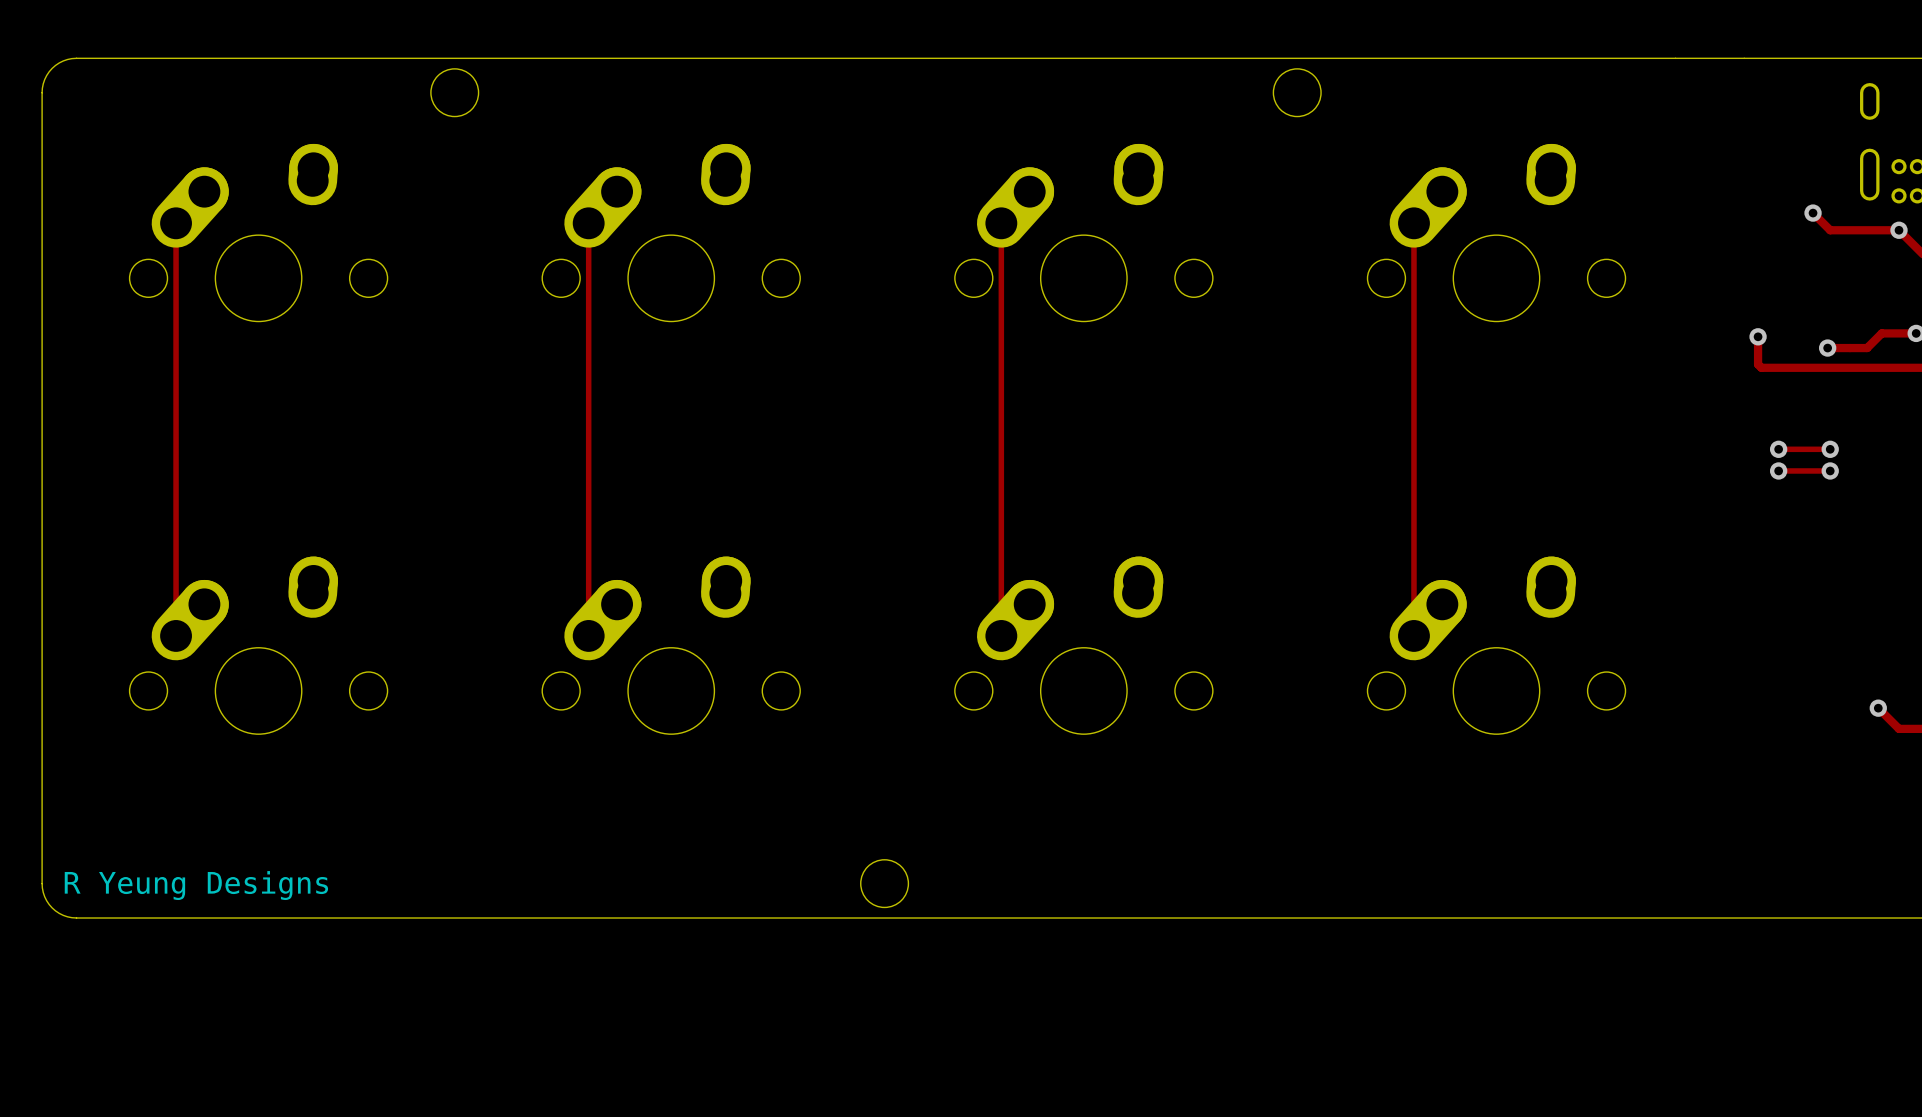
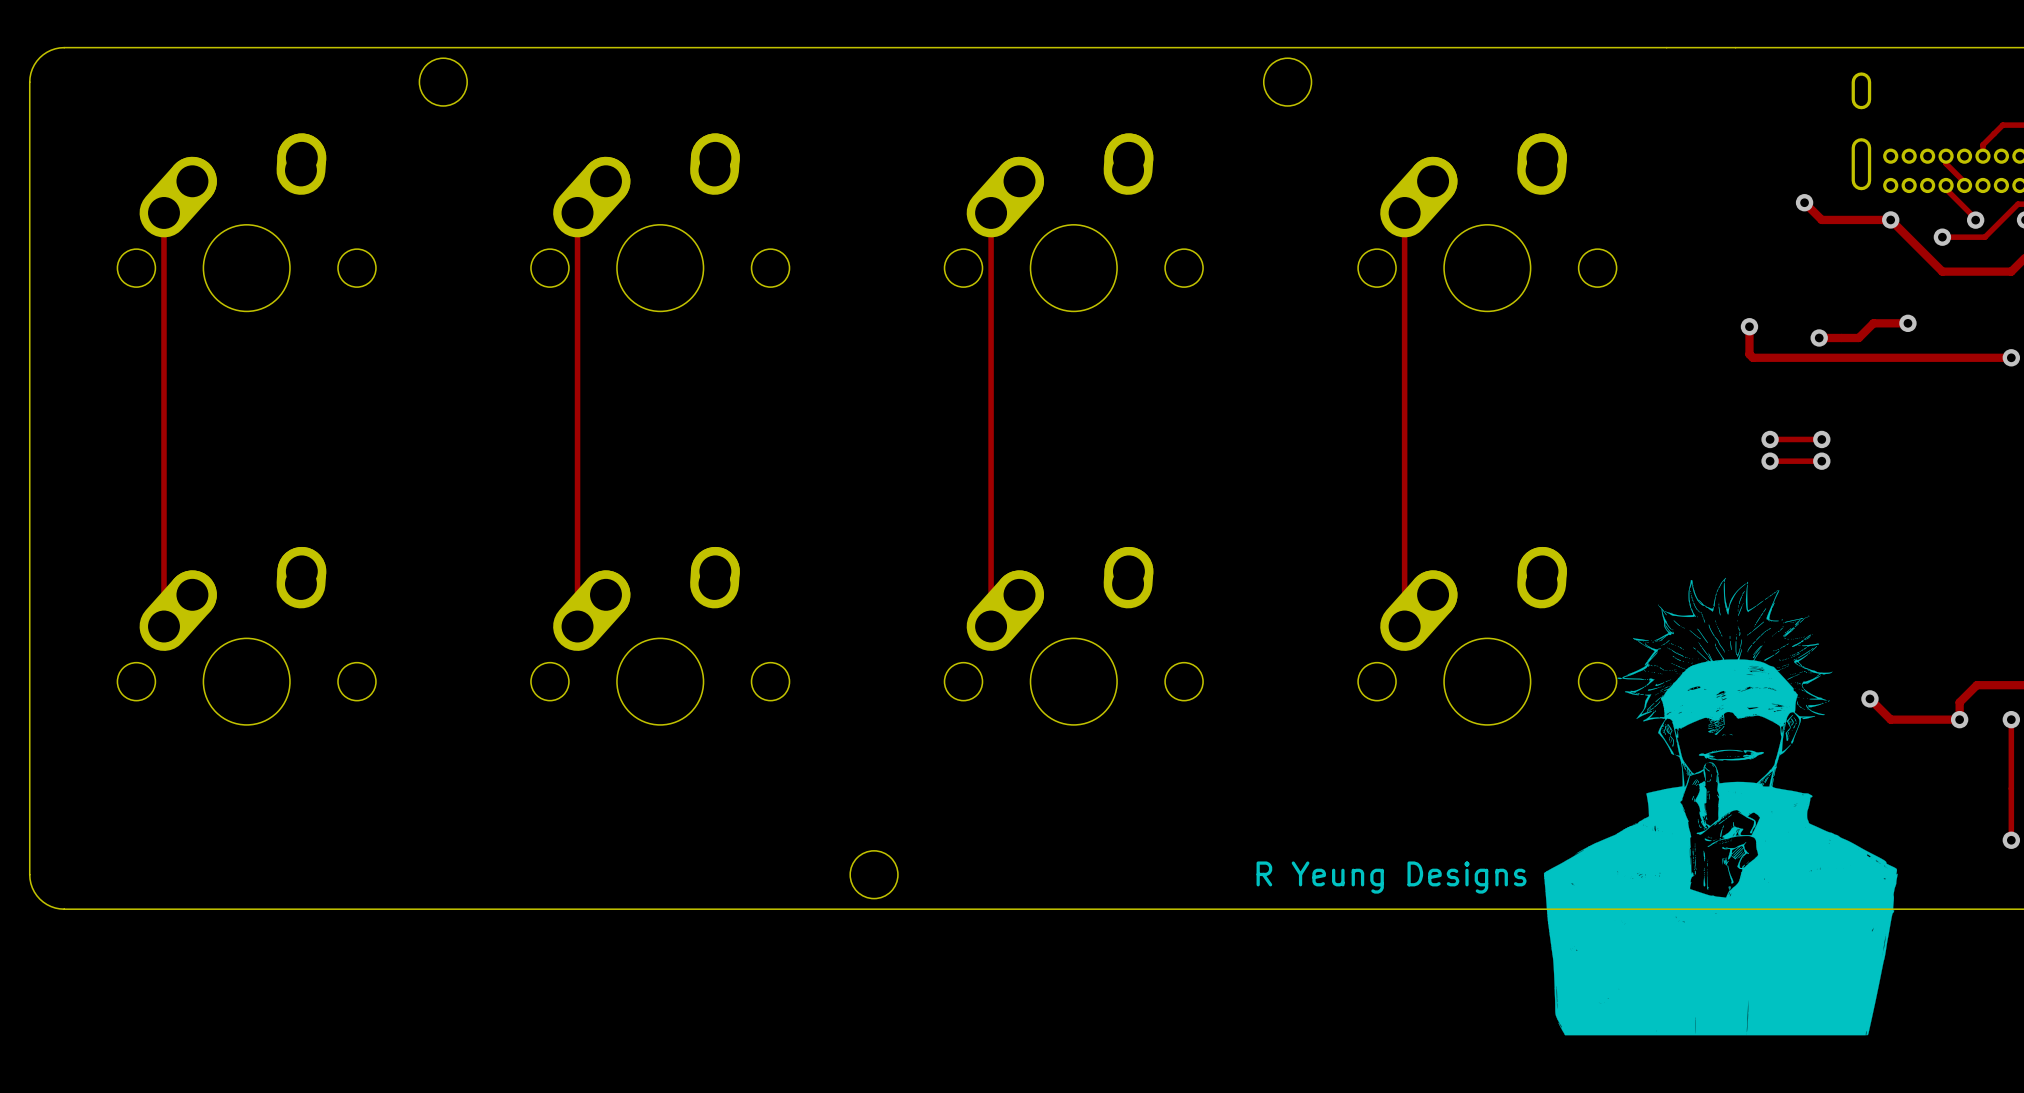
drawing: none -> [1543, 577, 1898, 1036]
text: R Yeung Designs (196, 885) -> none
text: none -> R Yeung Designs (1391, 877)

